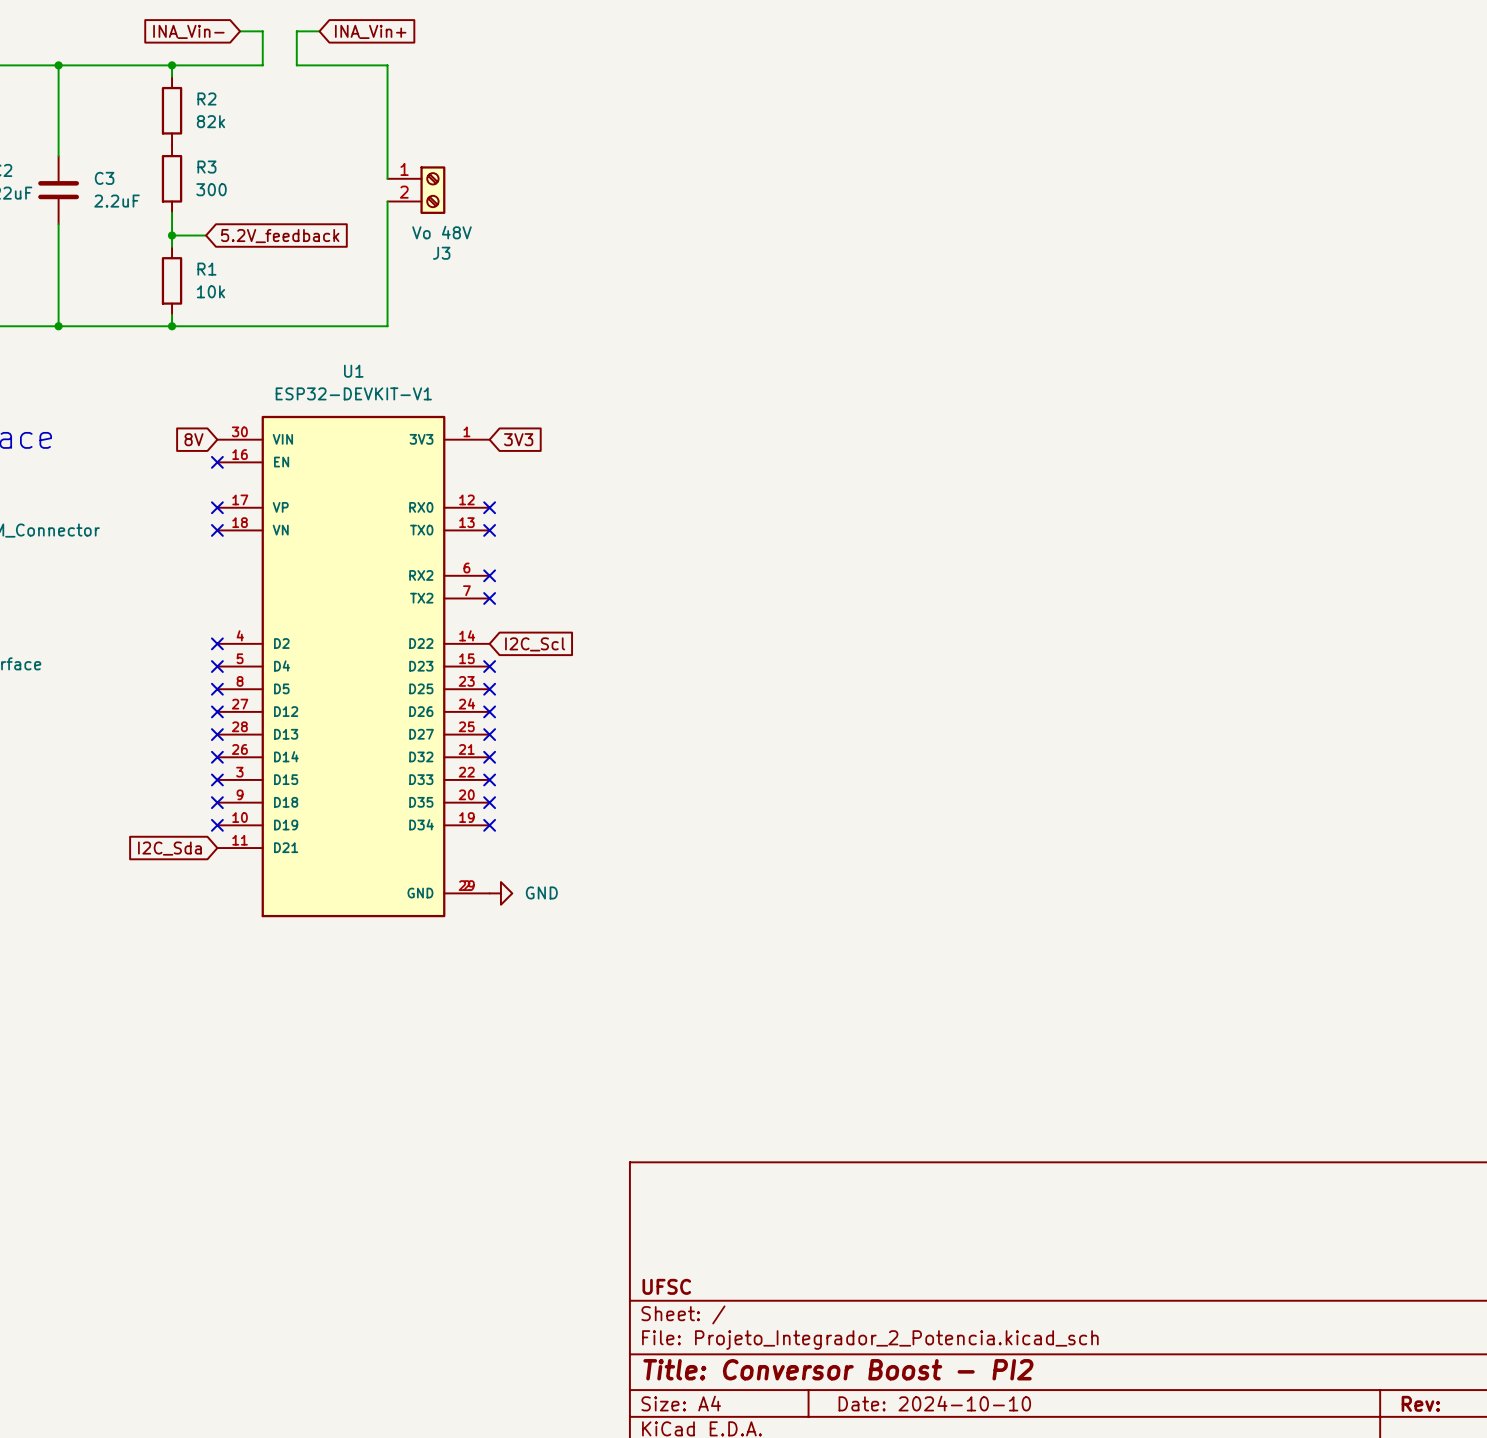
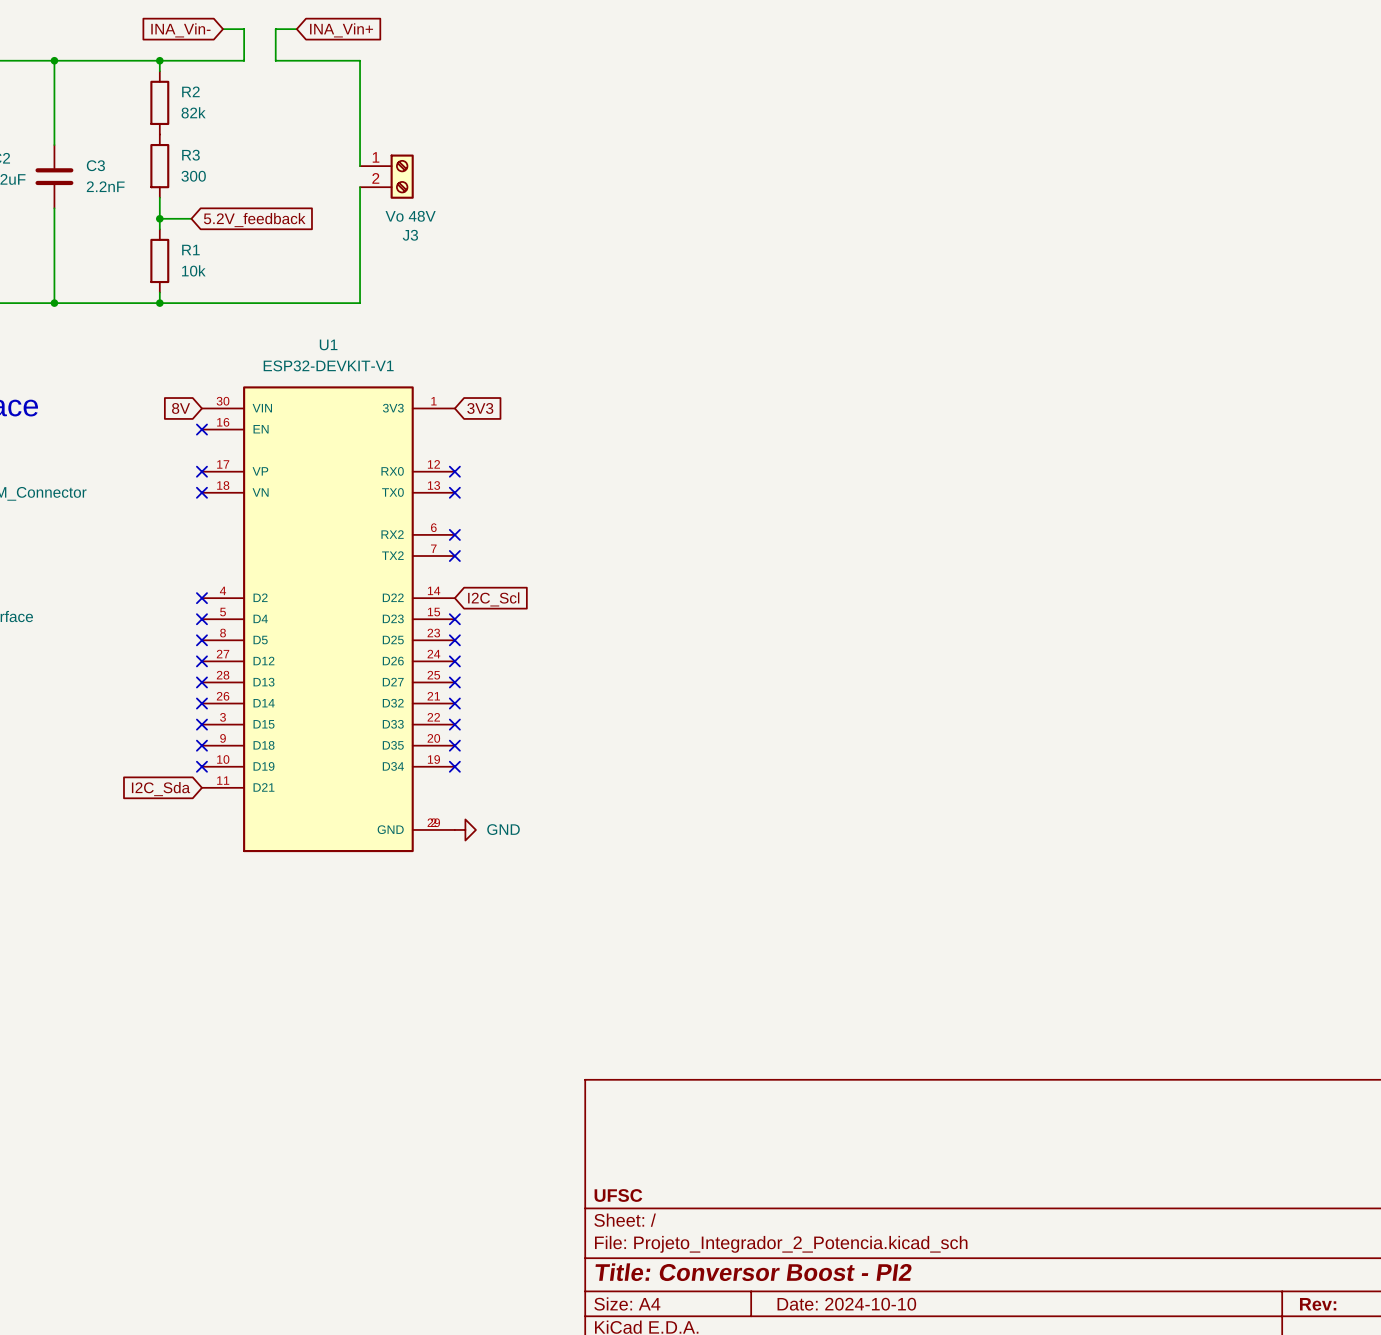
C3 value: 2.2uF (117, 201) -> 2.2nF (105, 186)

